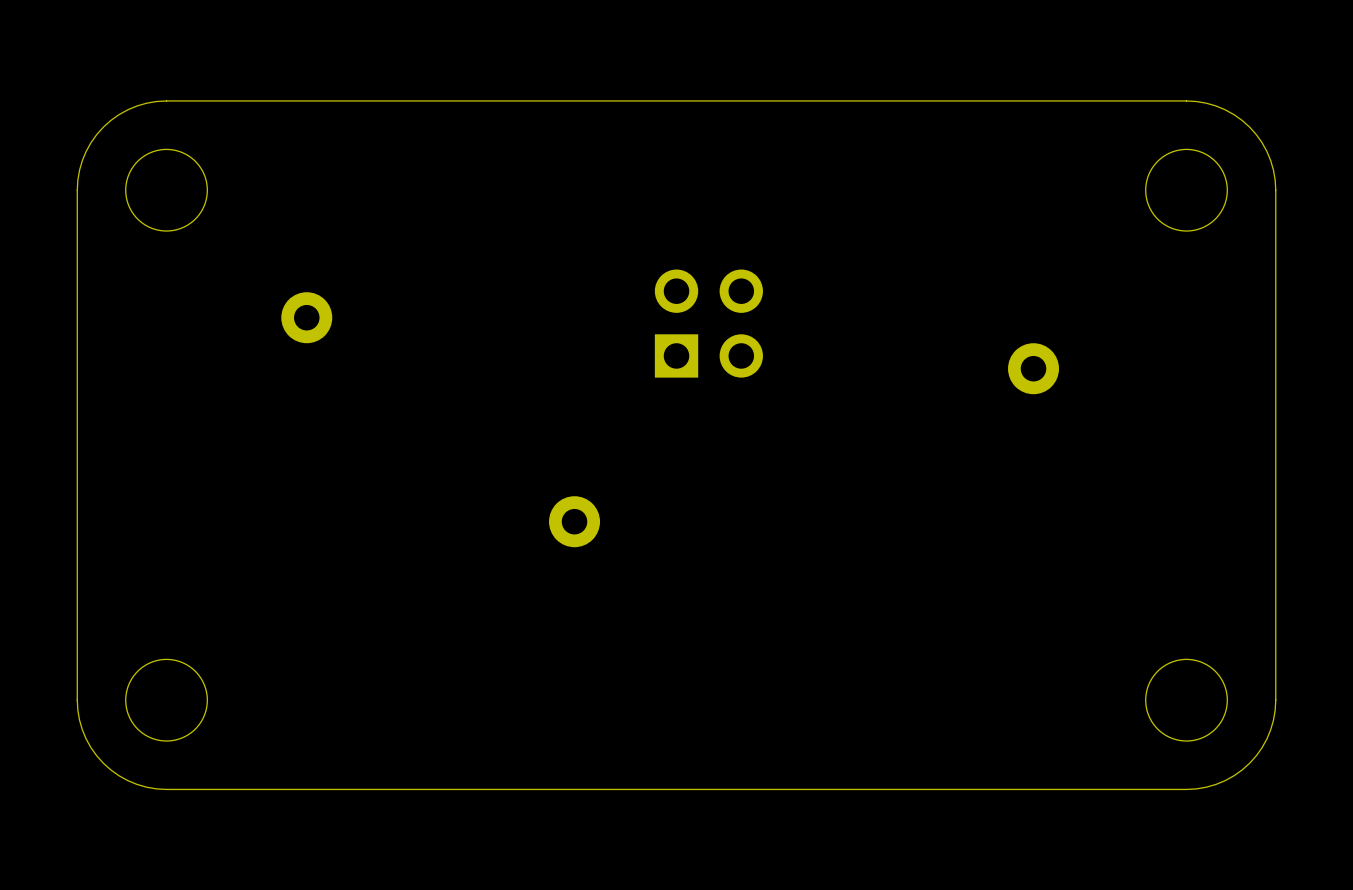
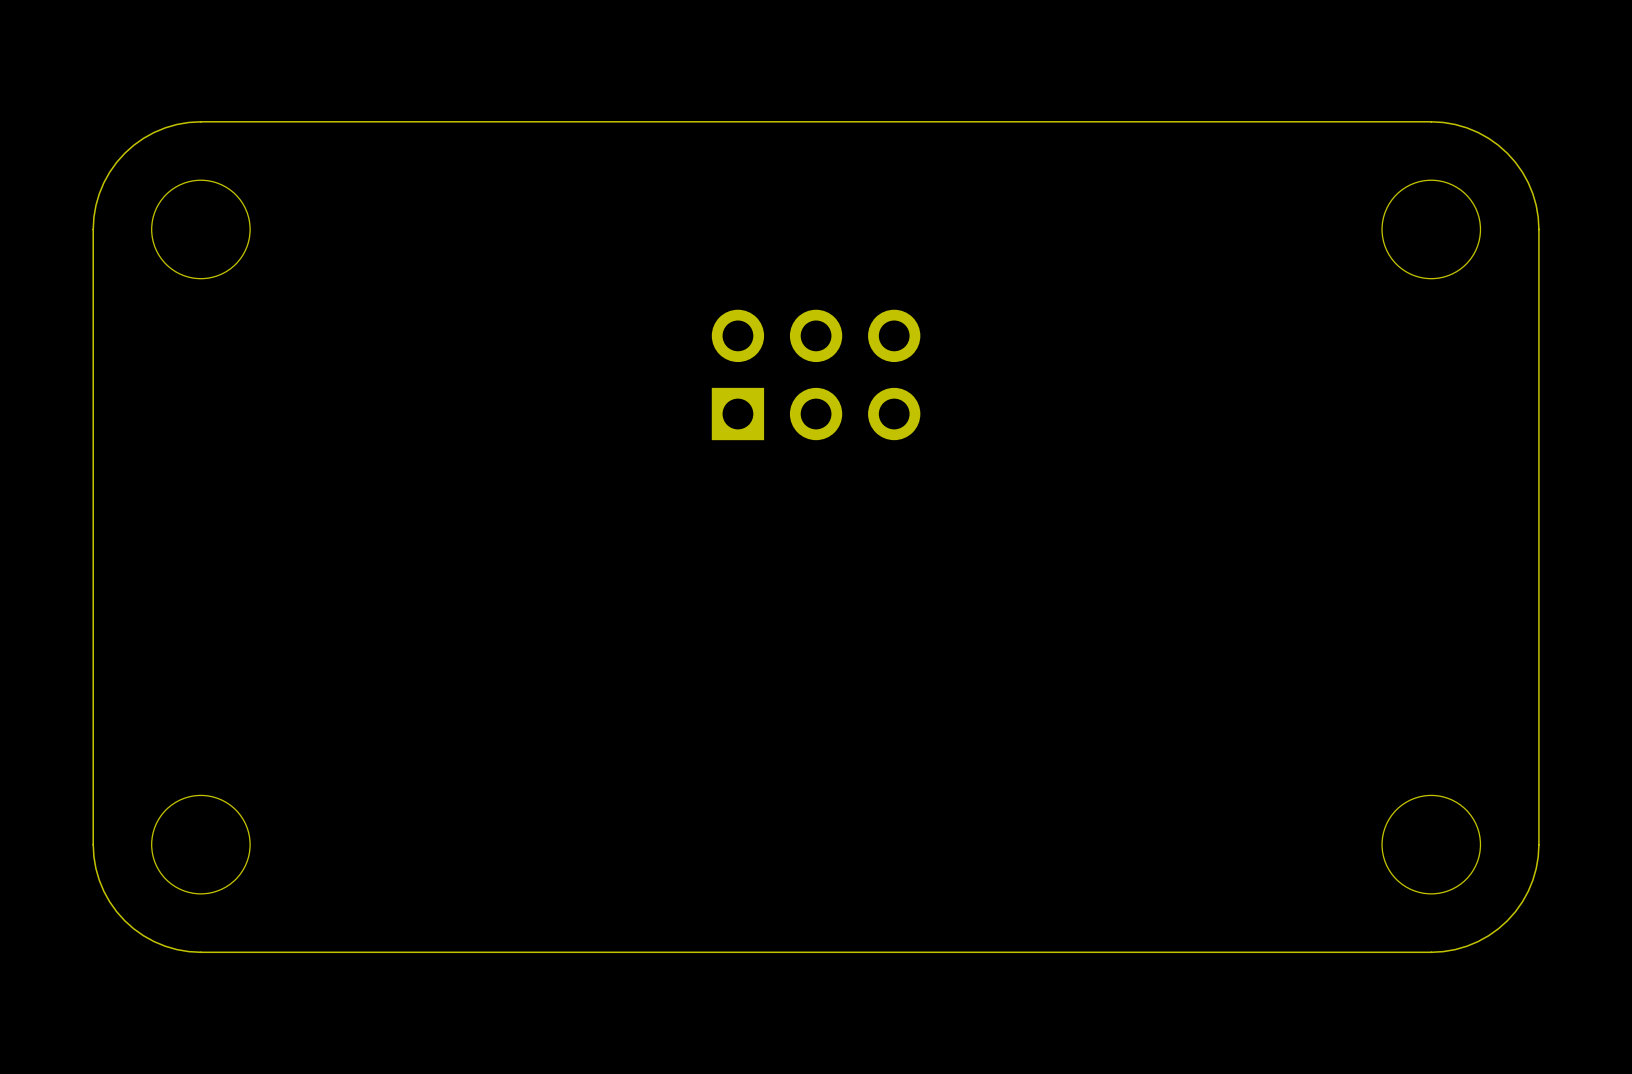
part: none -> (816, 374)
part: (306, 317) -> none
part: (708, 323) -> none
part: (1033, 368) -> none
part: (574, 521) -> none

